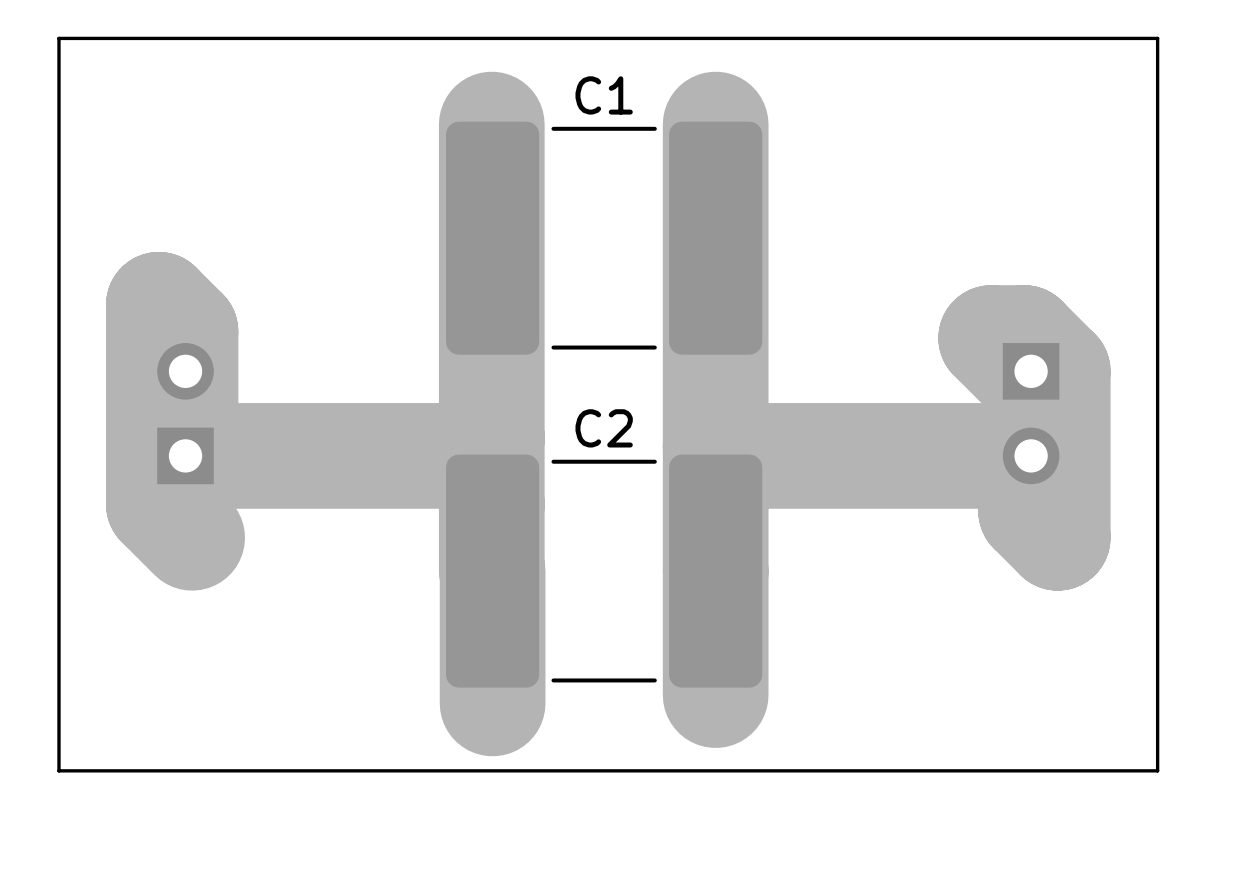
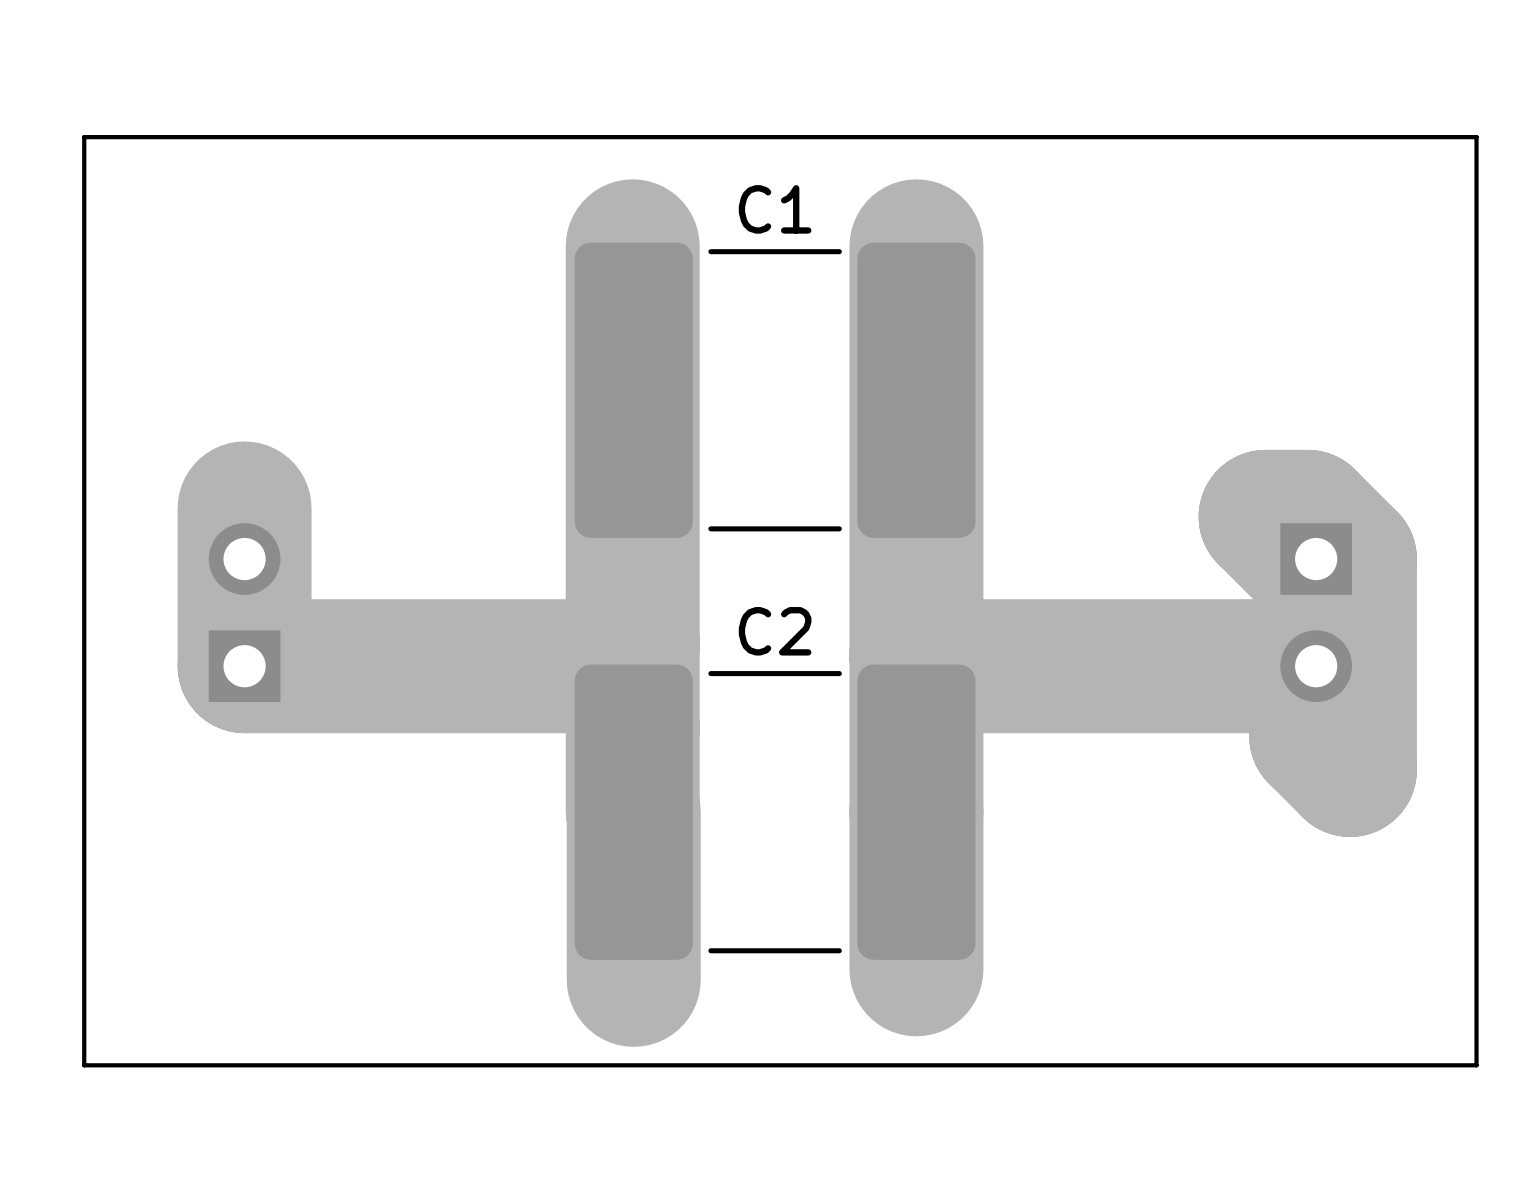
track: (185, 331) (158, 304) (158, 504) (192, 537) -> none

